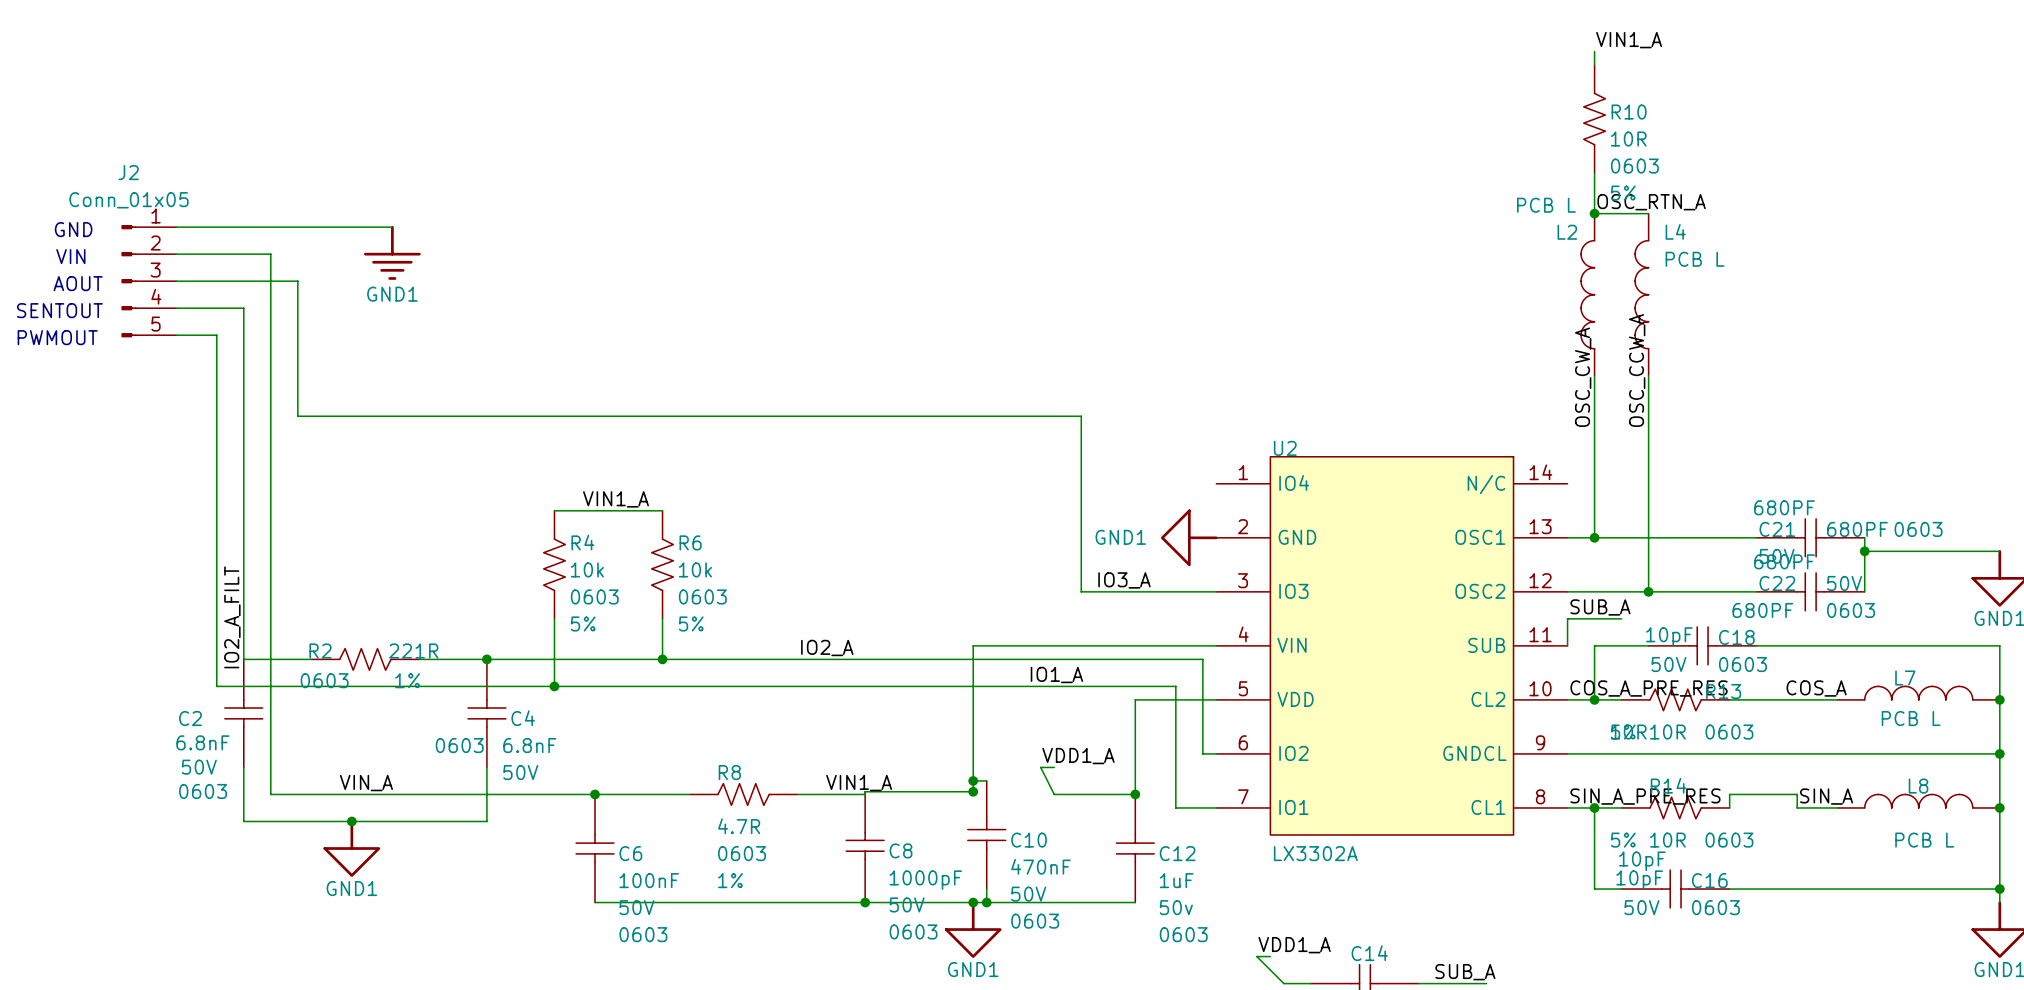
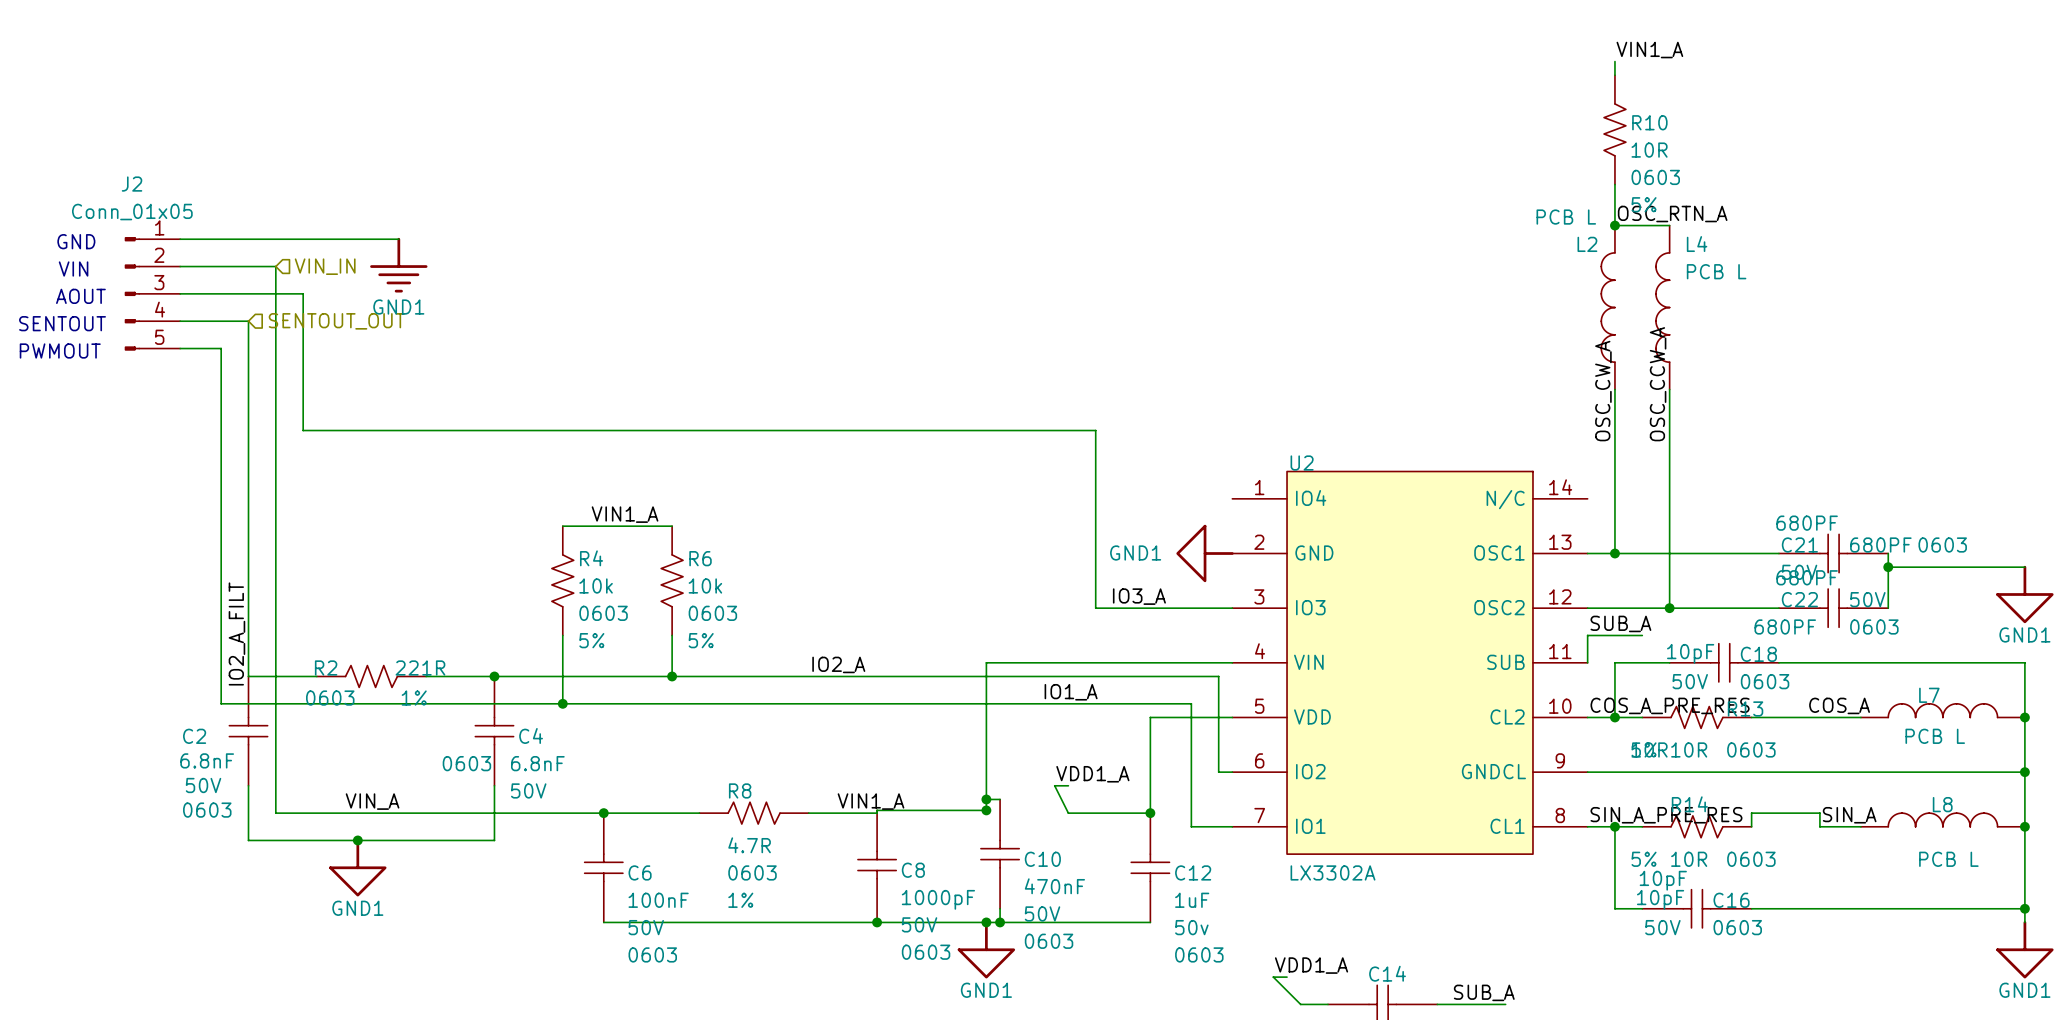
hierarchical label: none -> VIN_IN (325, 266)
hierarchical label: none -> SENTOUT_OUT (336, 321)

